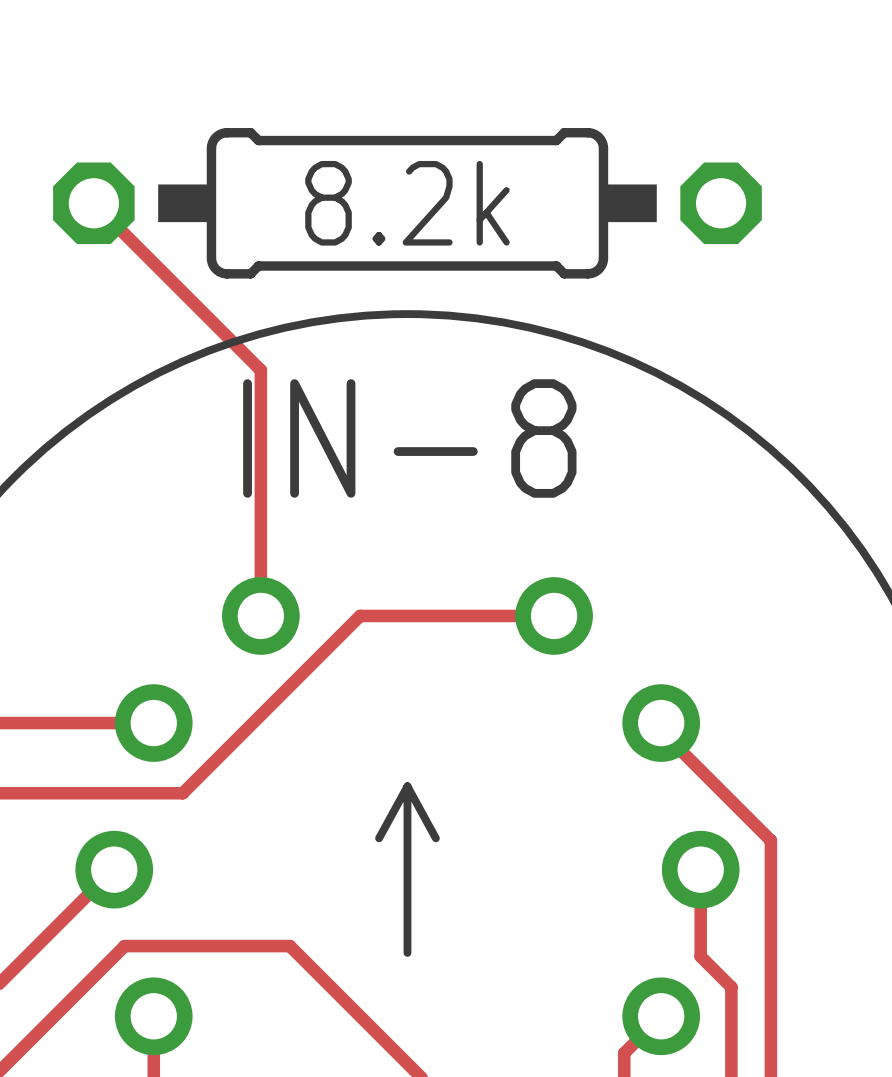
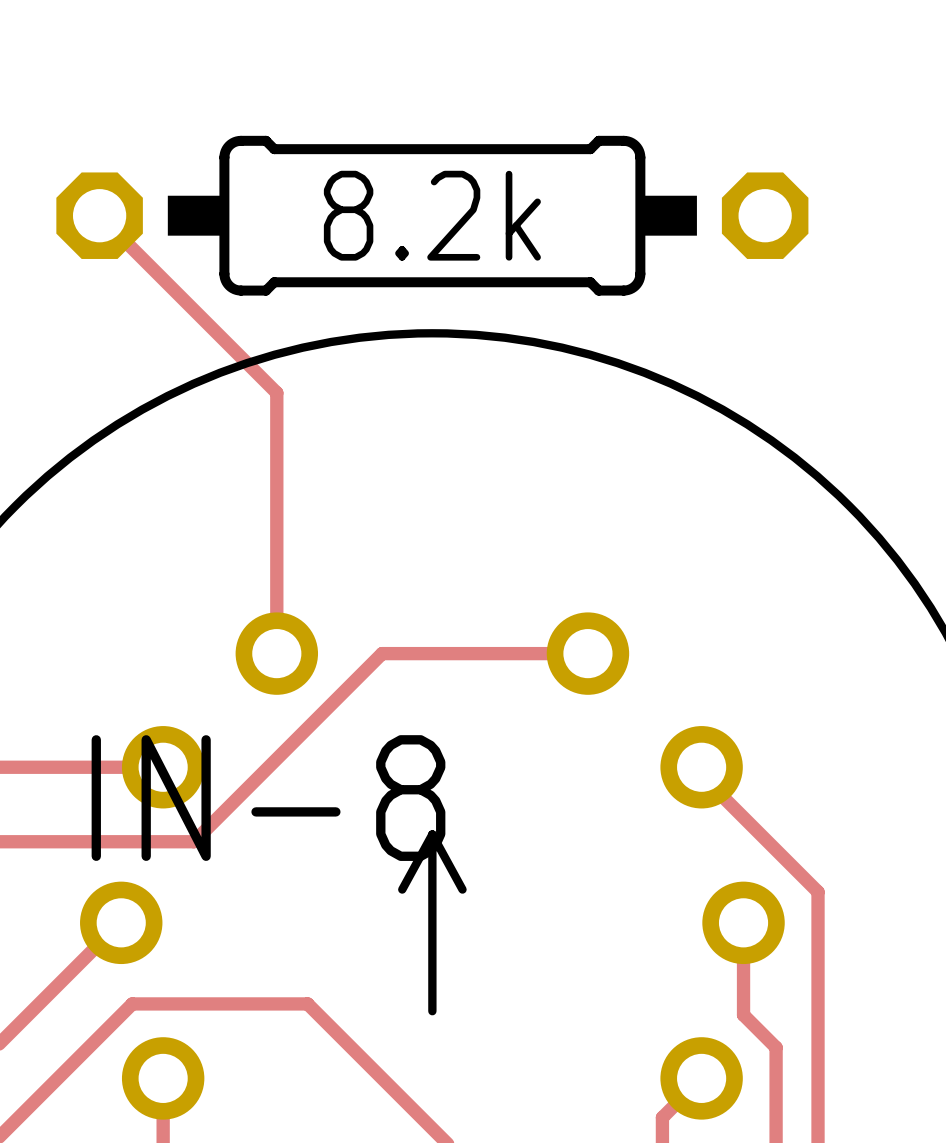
text position: IN-8 (409, 438) -> IN-8 (268, 798)

